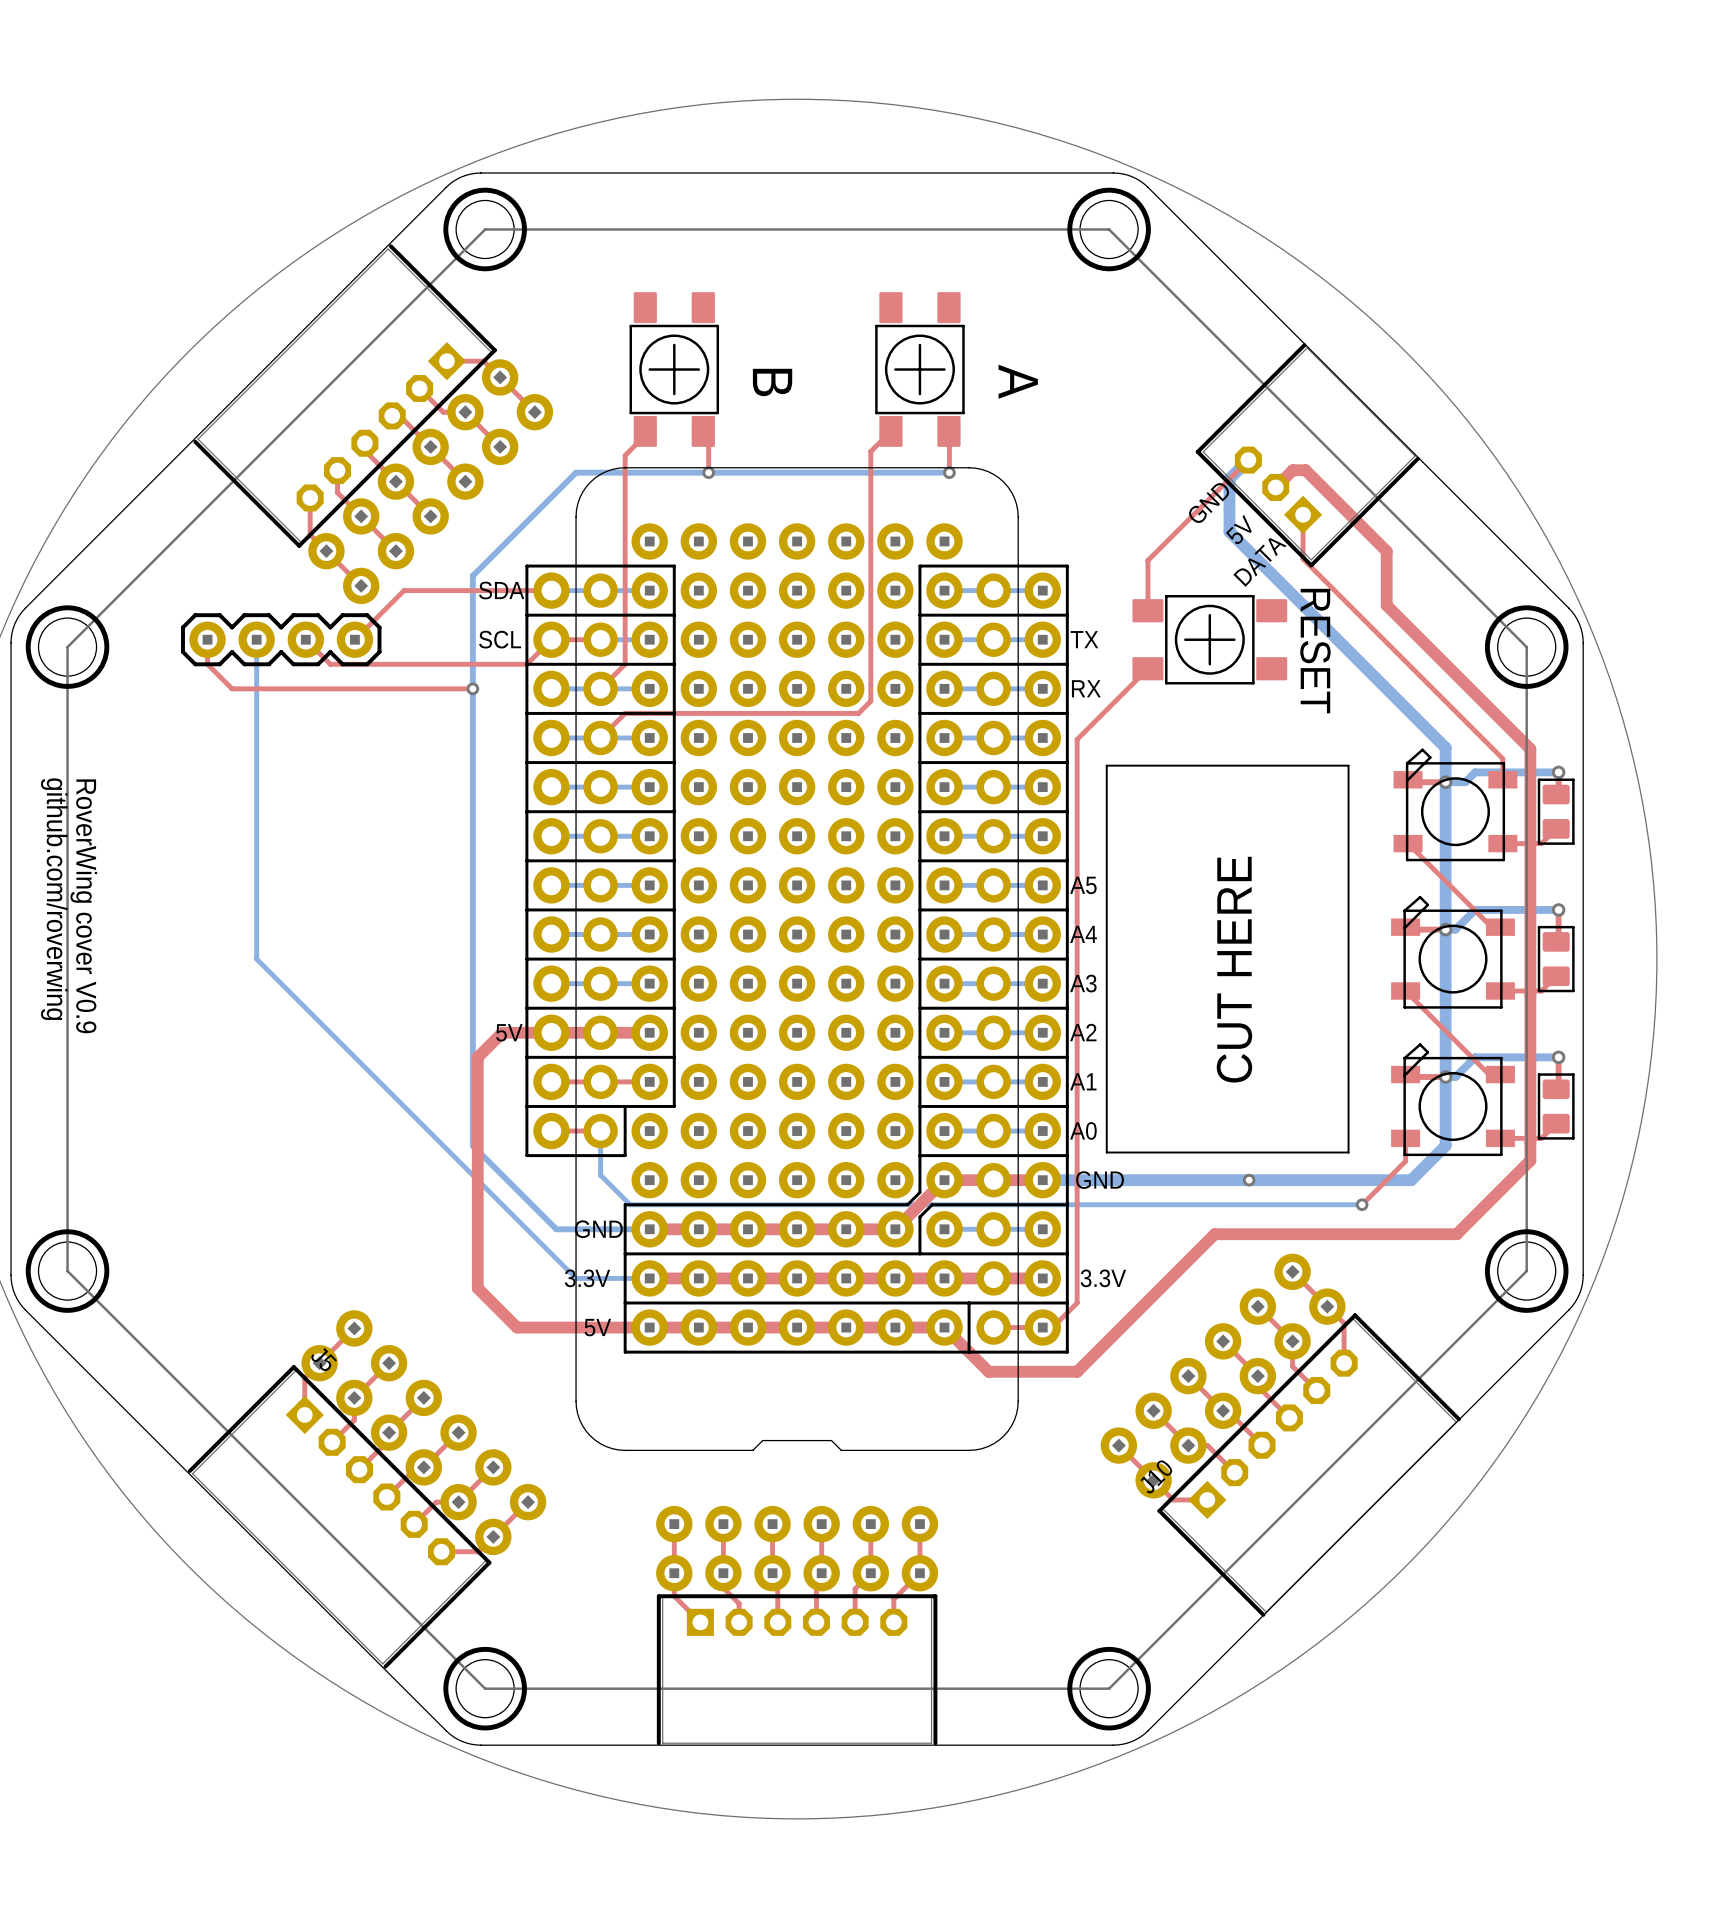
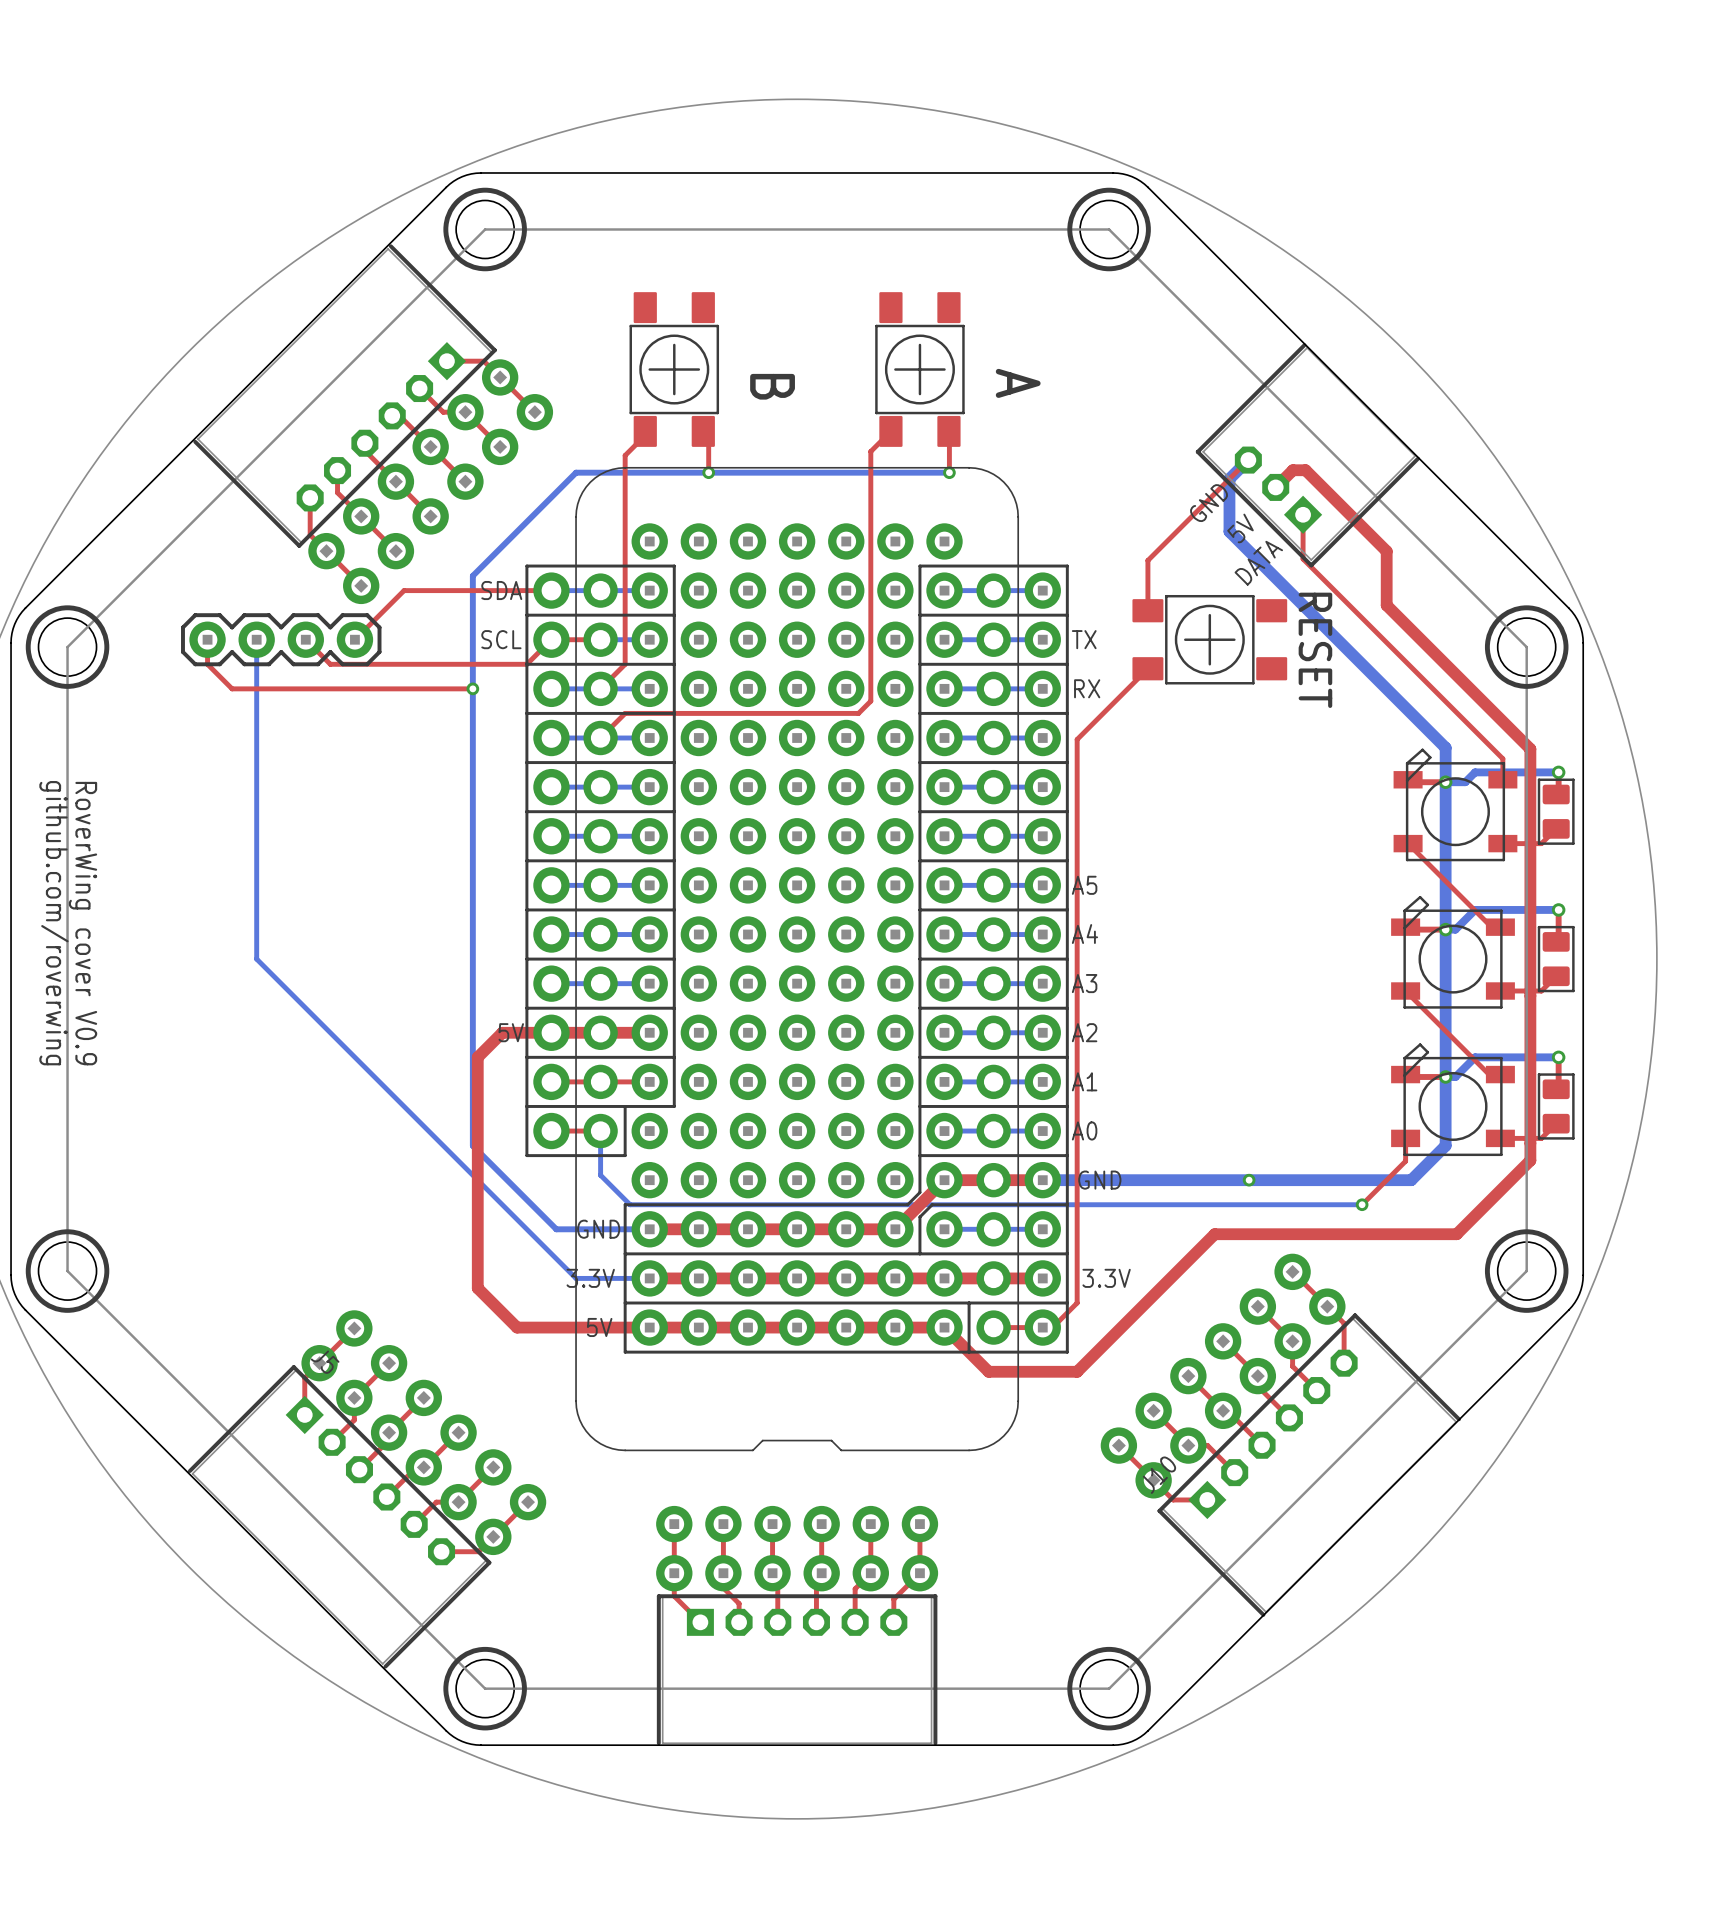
board edge: (1106, 765) (1348, 765) (1348, 1152) (1106, 1152) (1106, 765) -> none
text: CUT HERE (1234, 969) -> none

